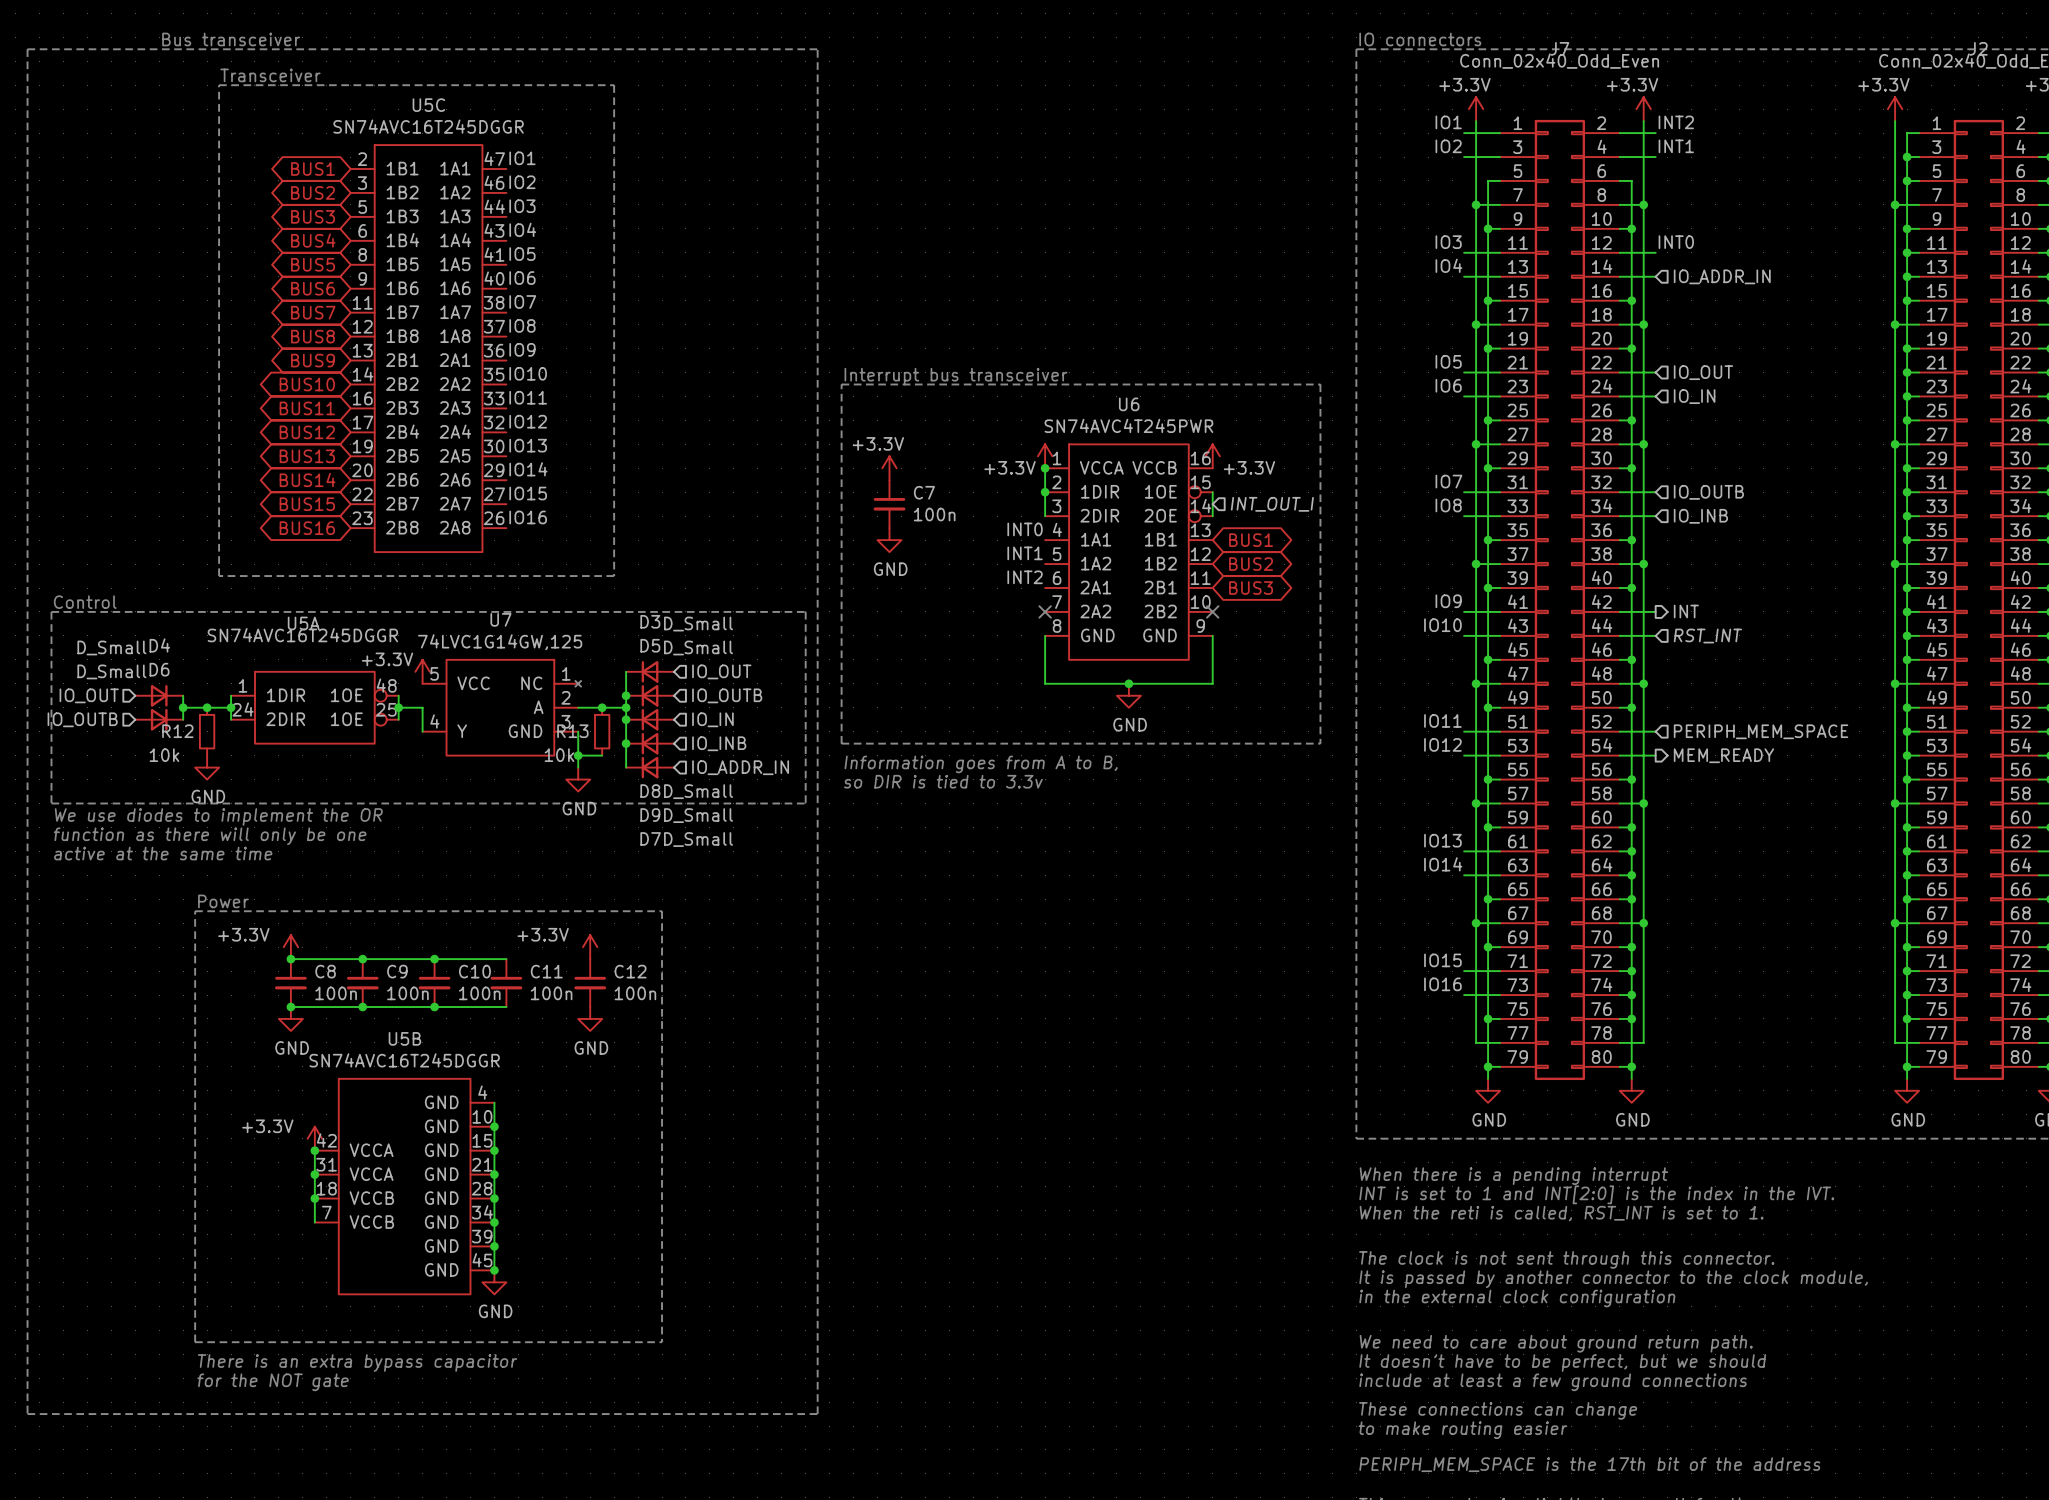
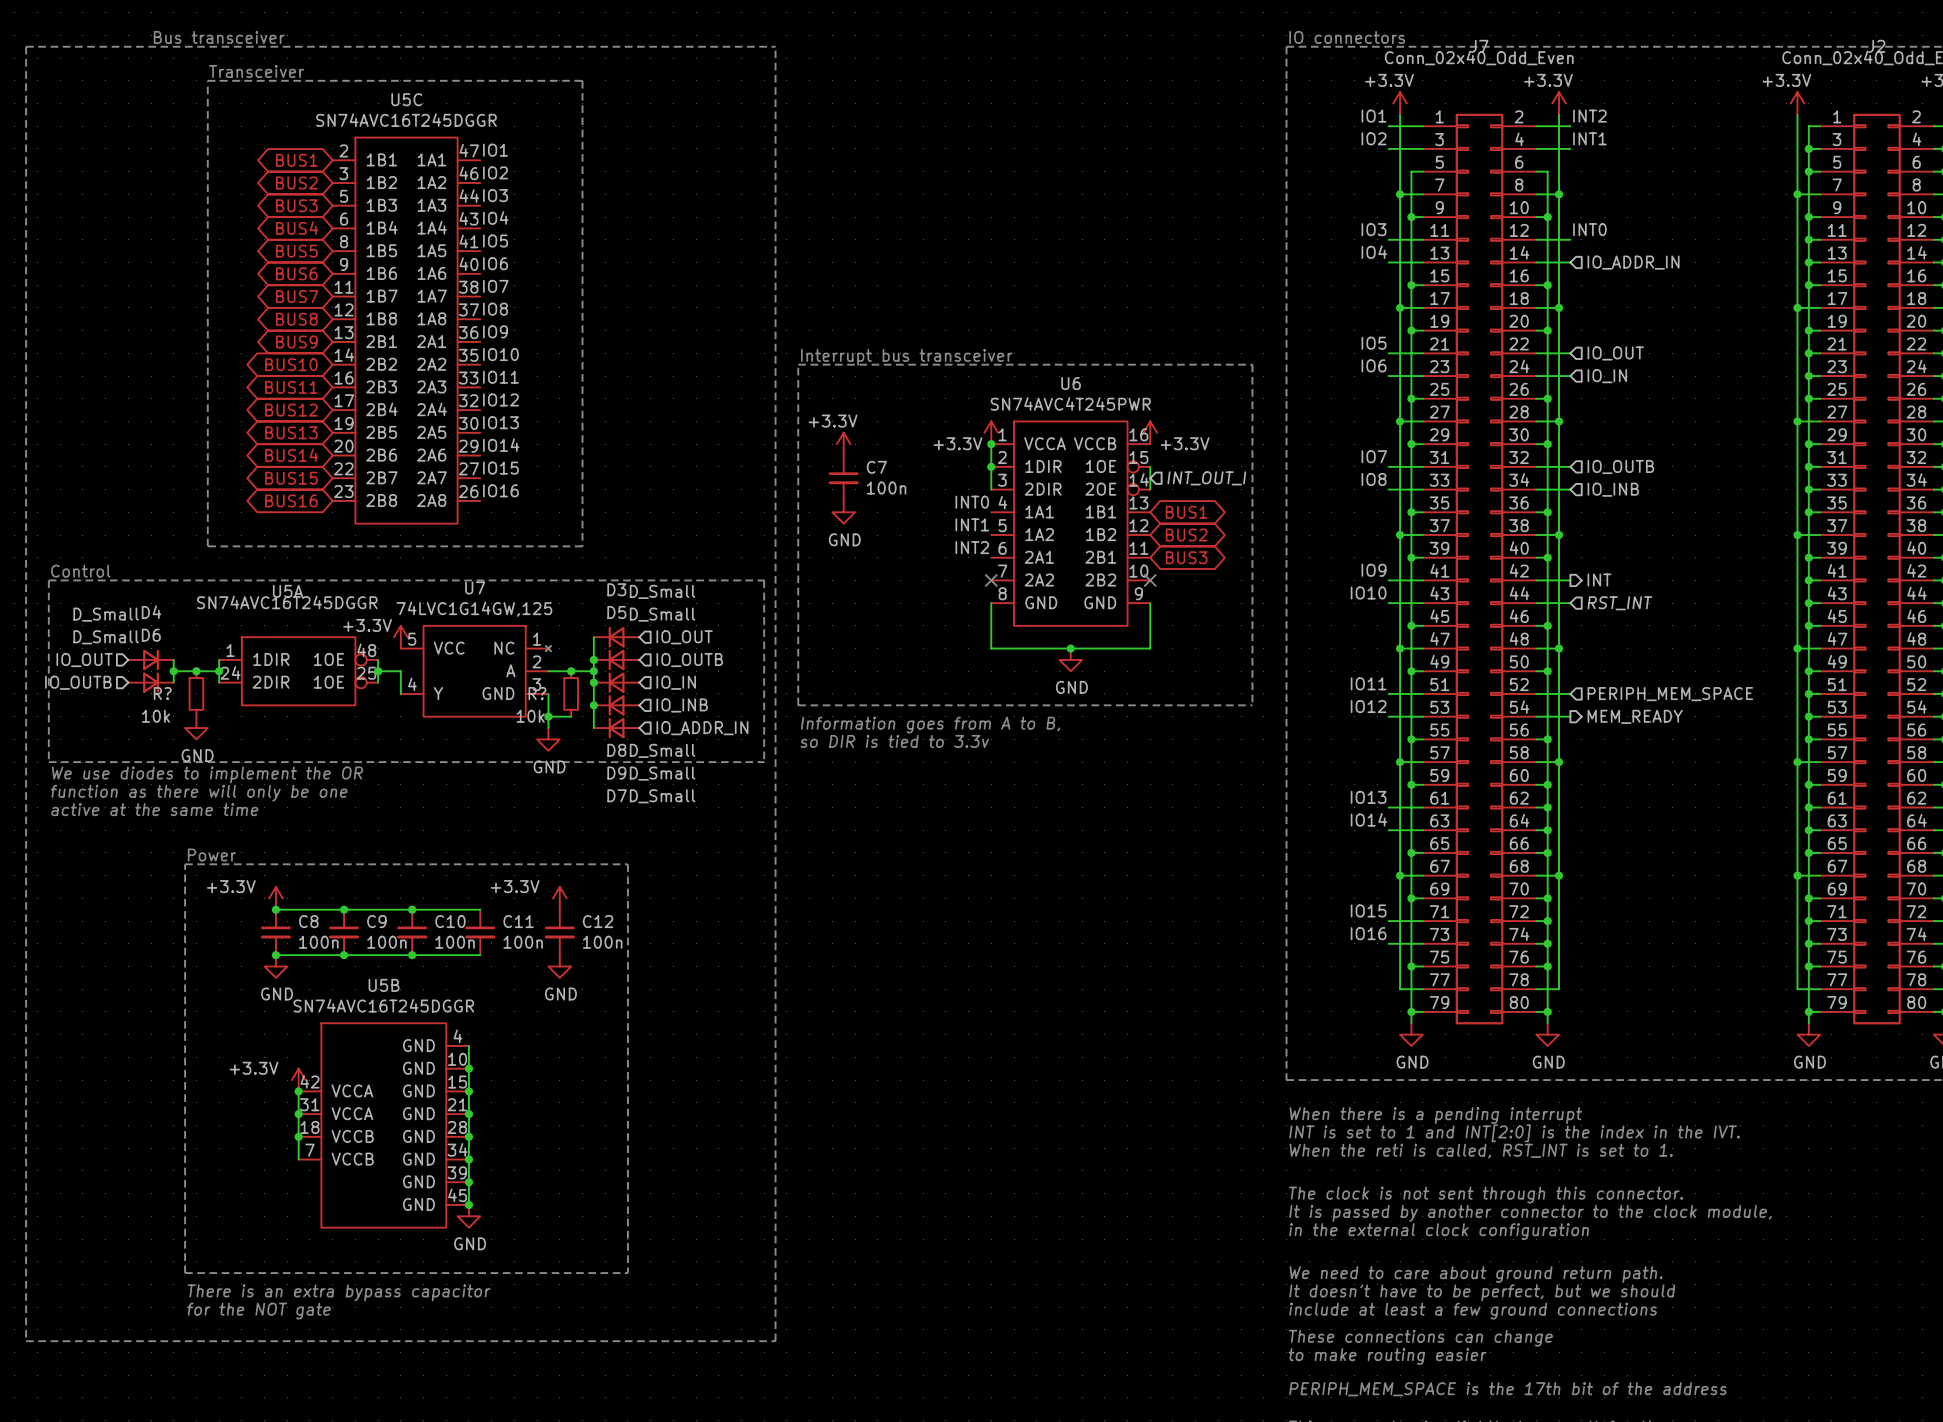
R12 name: R12 (177, 731) -> R? (162, 693)
R13 name: R13 (572, 731) -> R? (537, 693)

